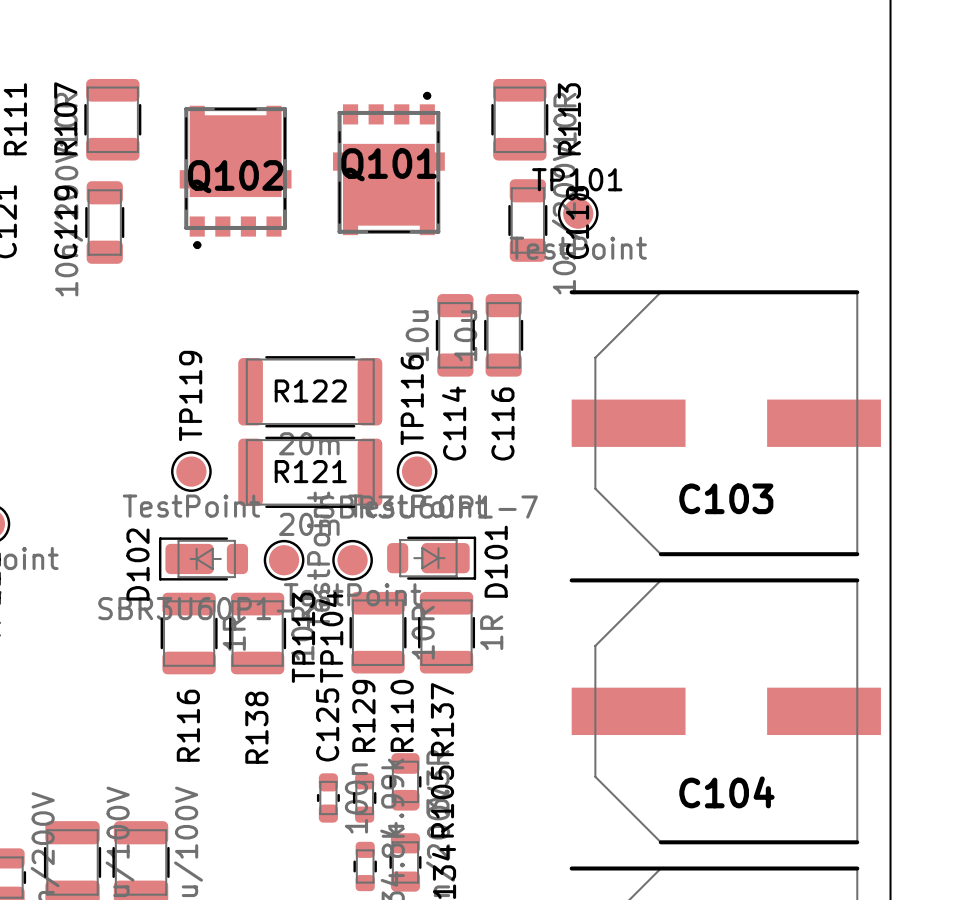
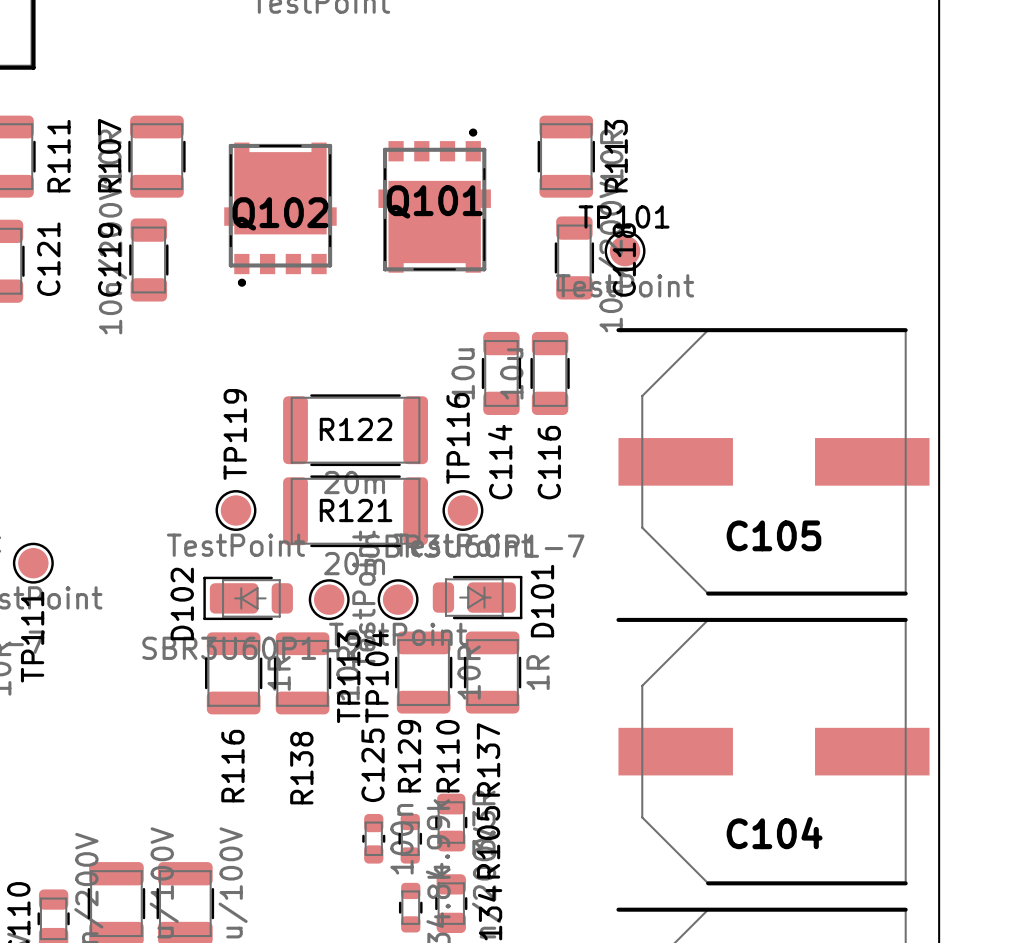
C103 name: C103 (726, 498) -> C105 (773, 535)

